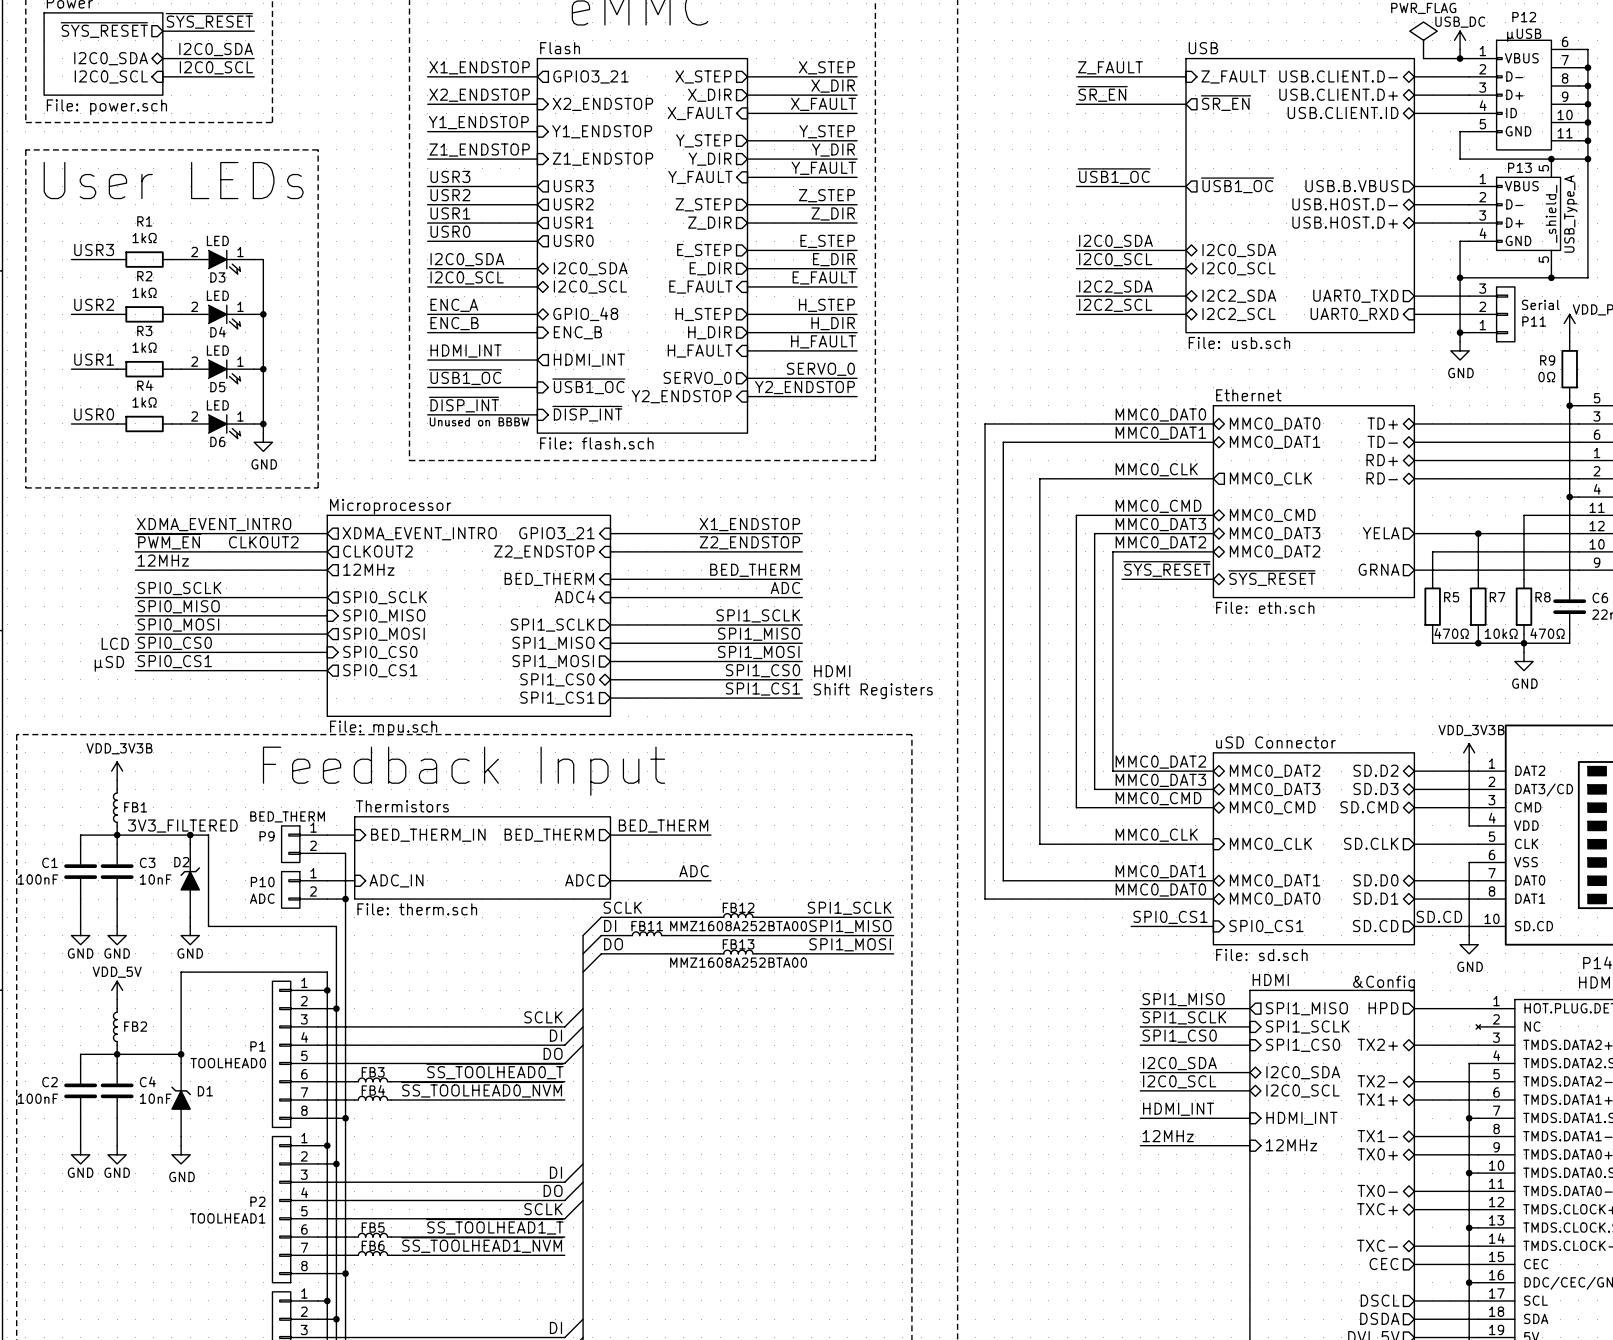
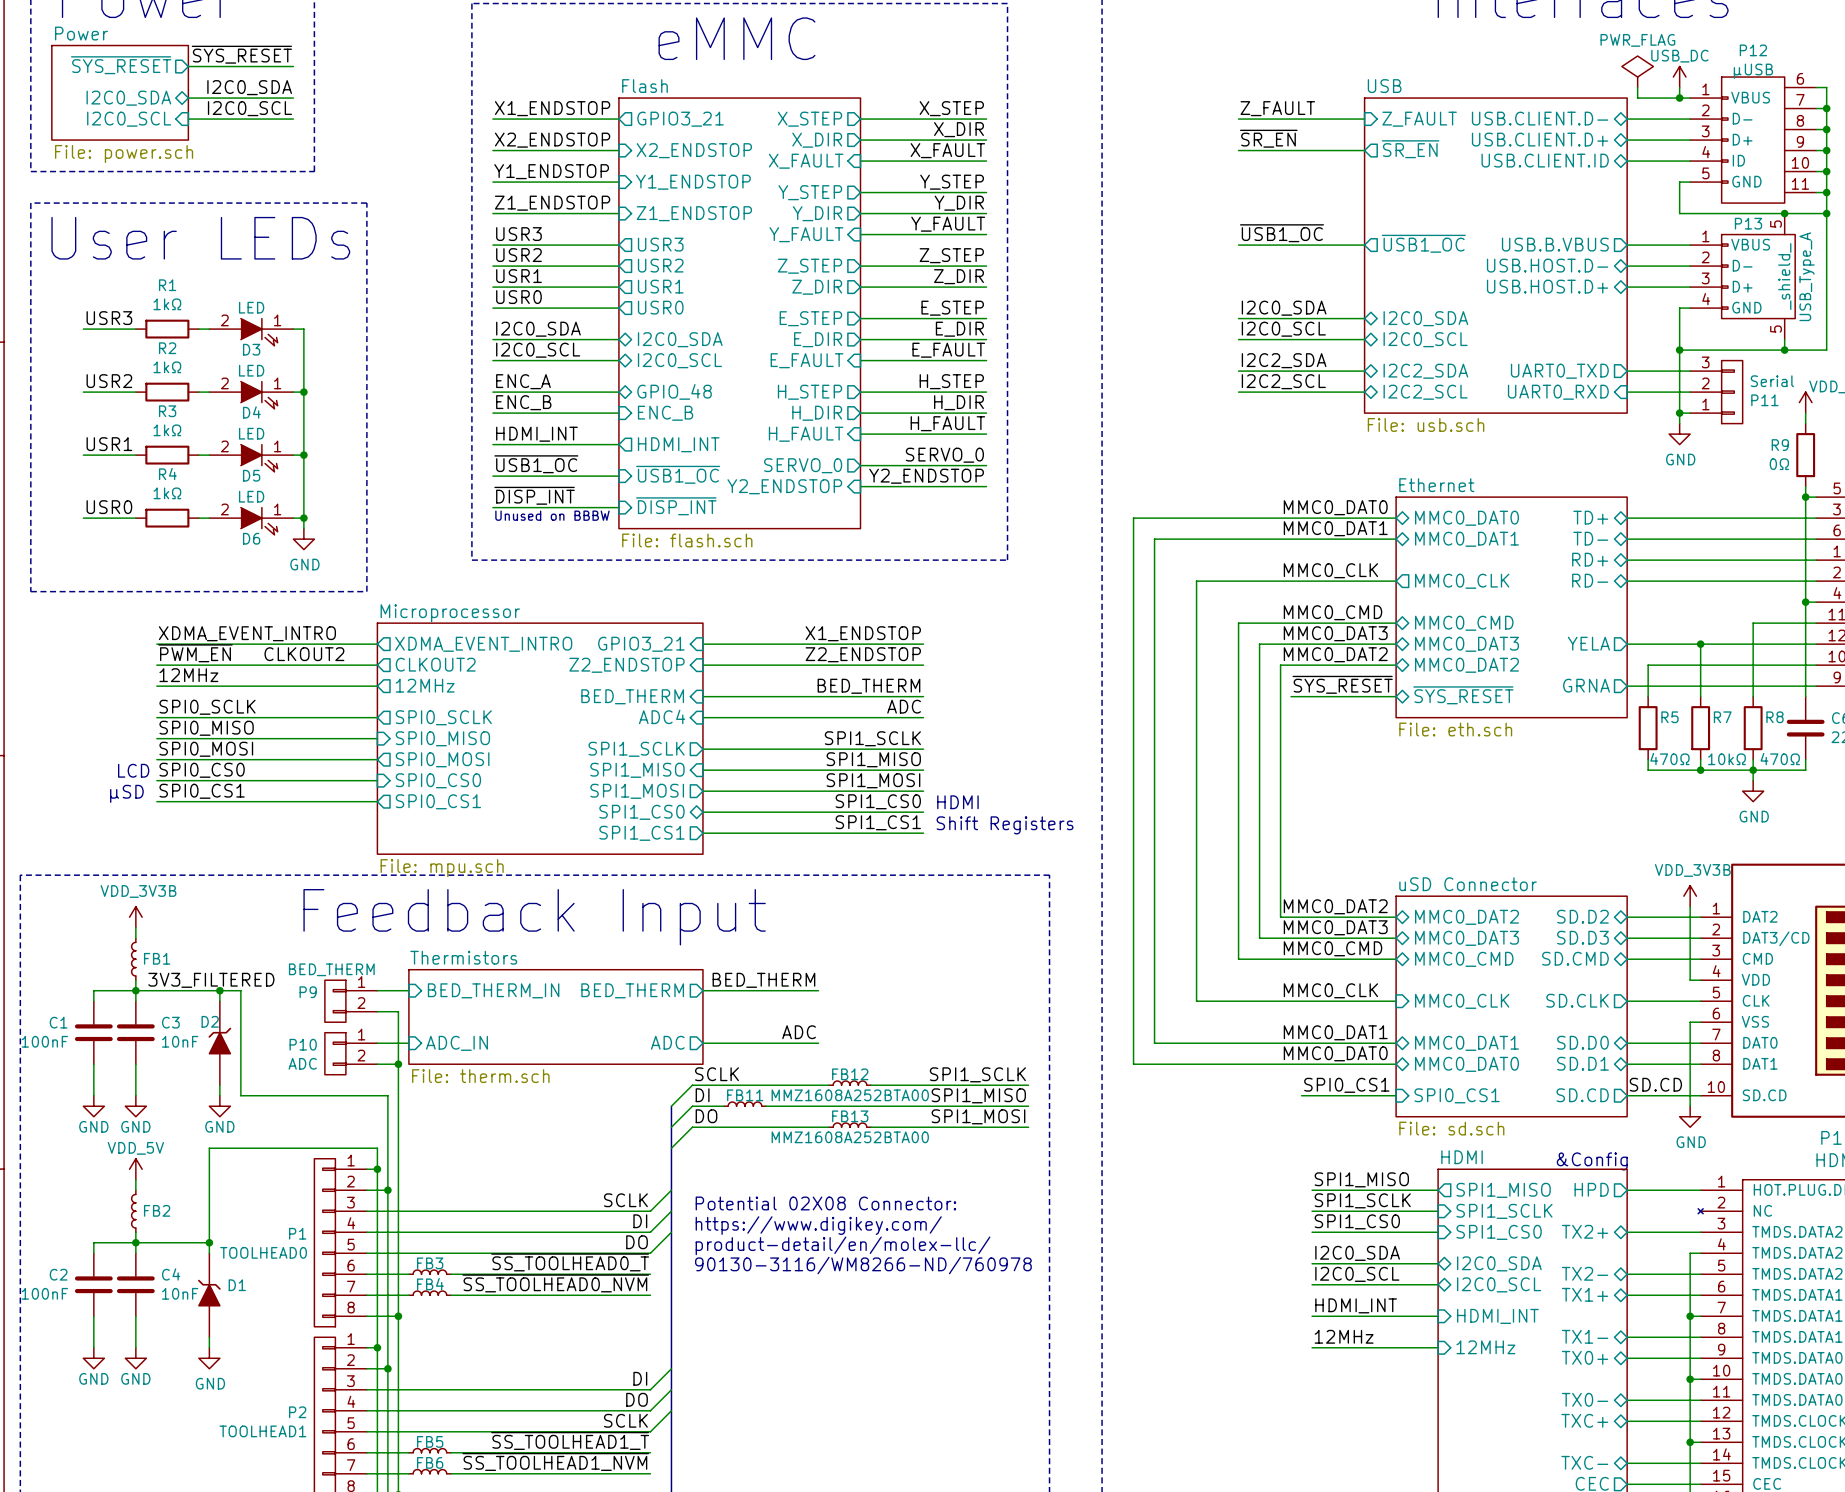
text: none -> Potential 02X08 Connector: (825, 1203)
text: none -> https://www.digikey.com/ (818, 1225)
text: none -> product-detail/en/molex-llc/ (843, 1245)
text: none -> 90130-3116/WM8266-ND/760978 (863, 1265)

